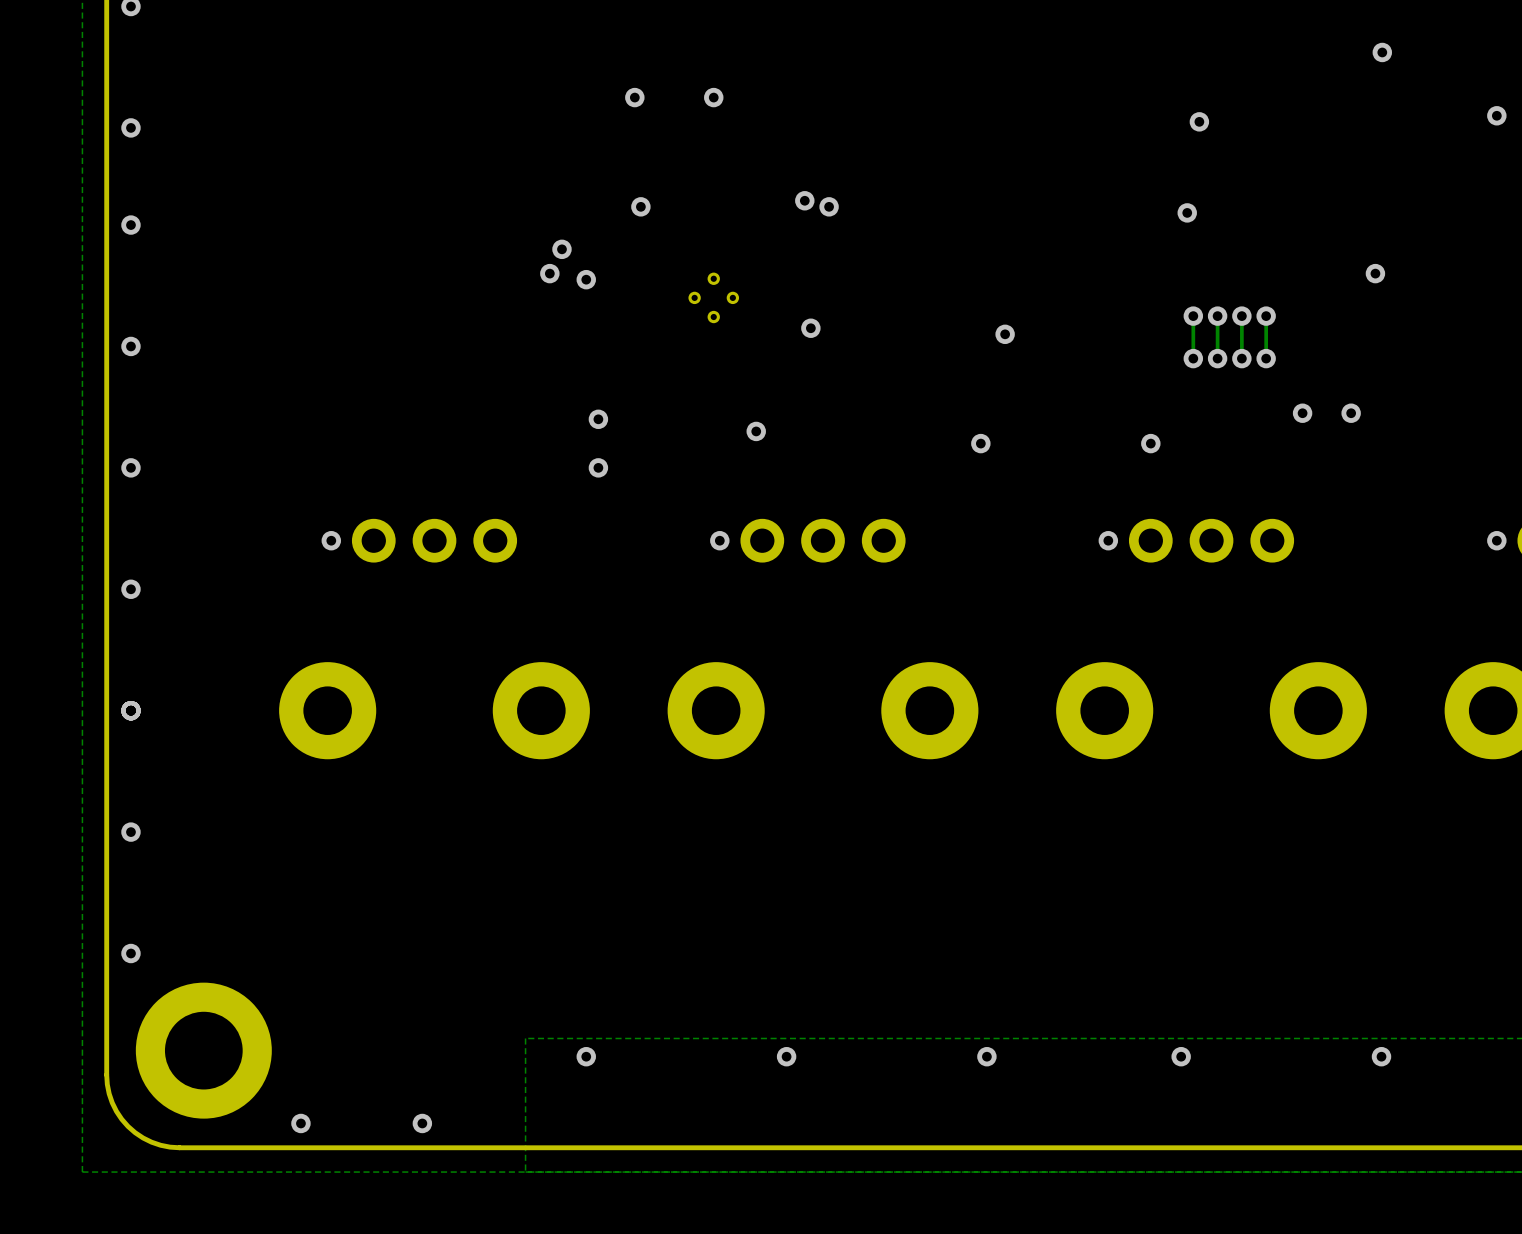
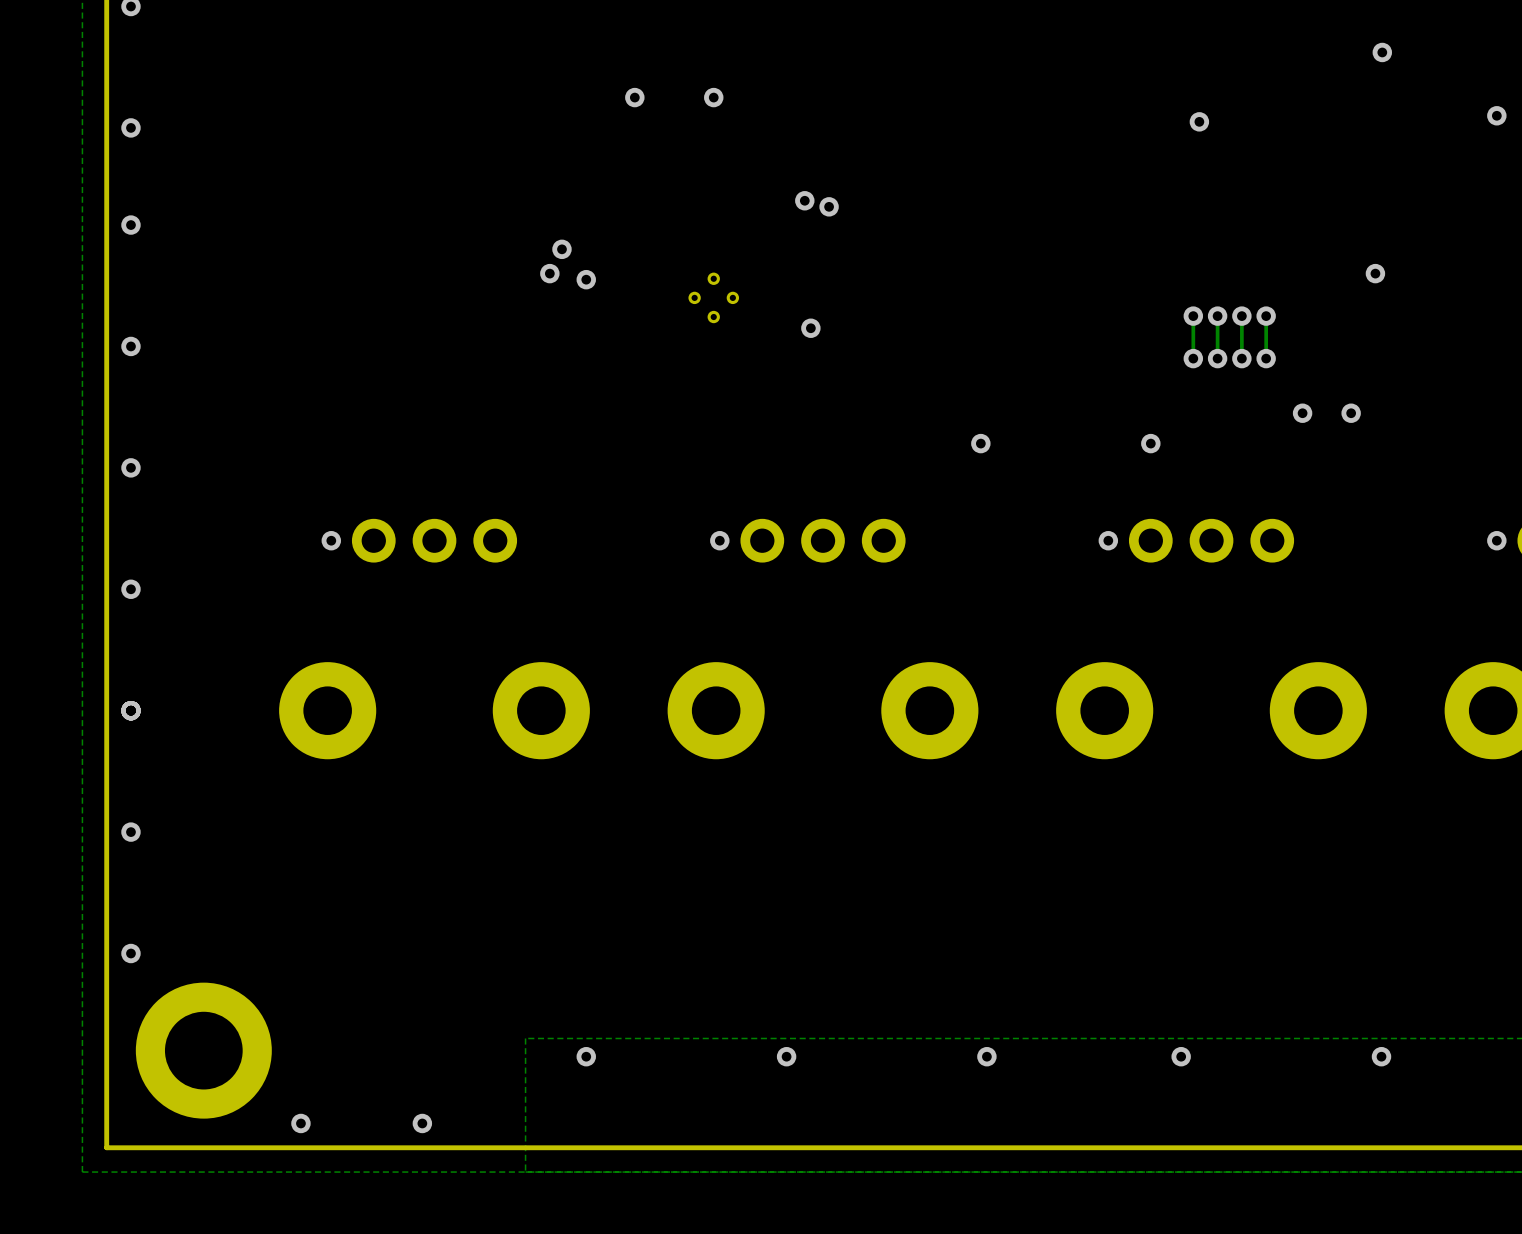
via: (640, 206) -> none
via: (1187, 212) -> none
via: (1005, 334) -> none
via: (598, 419) -> none
via: (756, 431) -> none
via: (598, 467) -> none
board edge: (106, 1074) (112, 1102) (128, 1126) (151, 1142) (179, 1147) -> (106, 1074) (106, 1147) (179, 1147)

